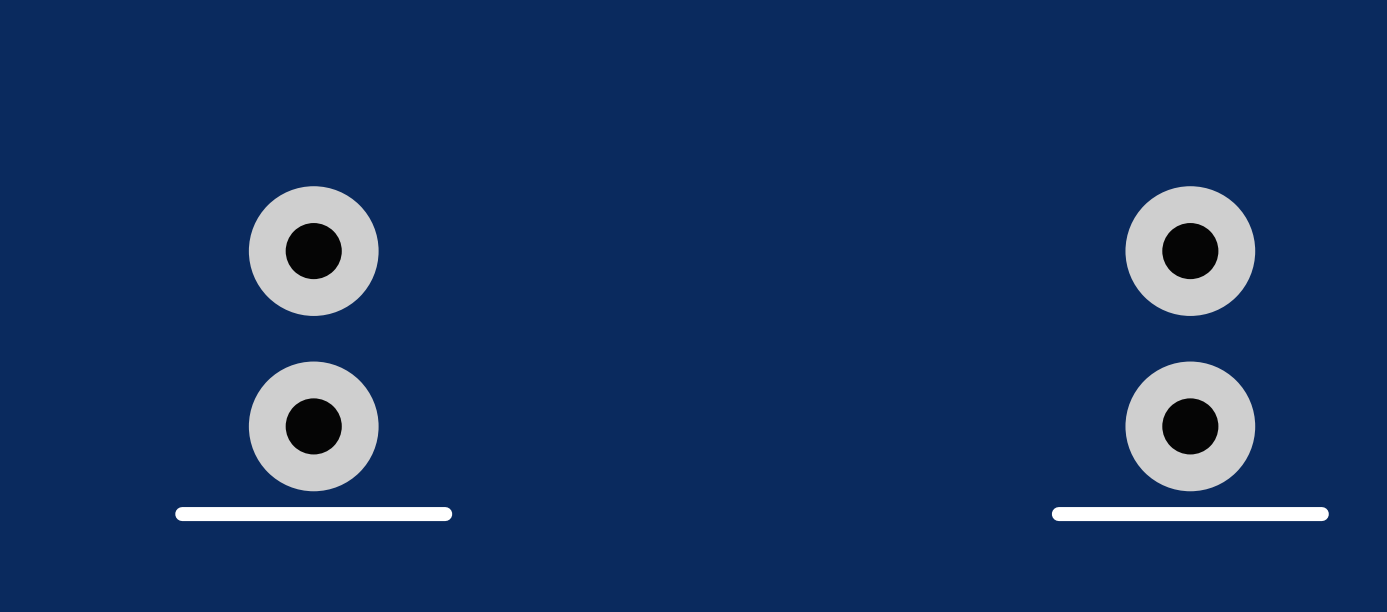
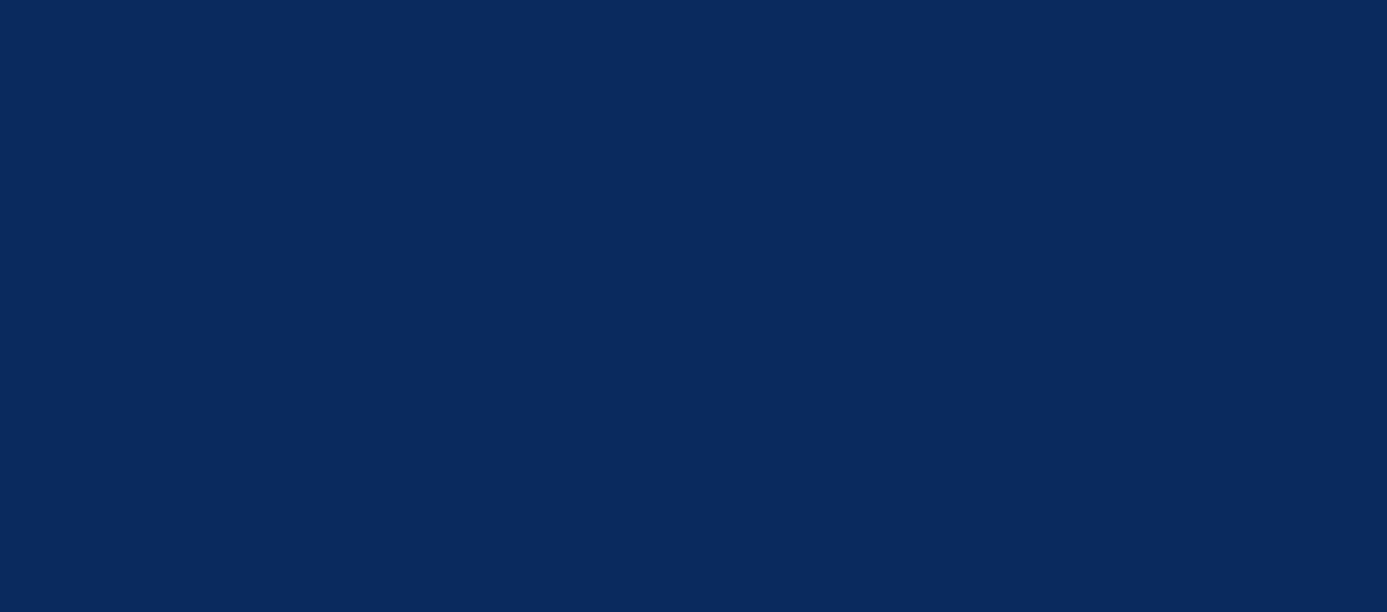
part: (313, 353) -> none
part: (1190, 353) -> none

